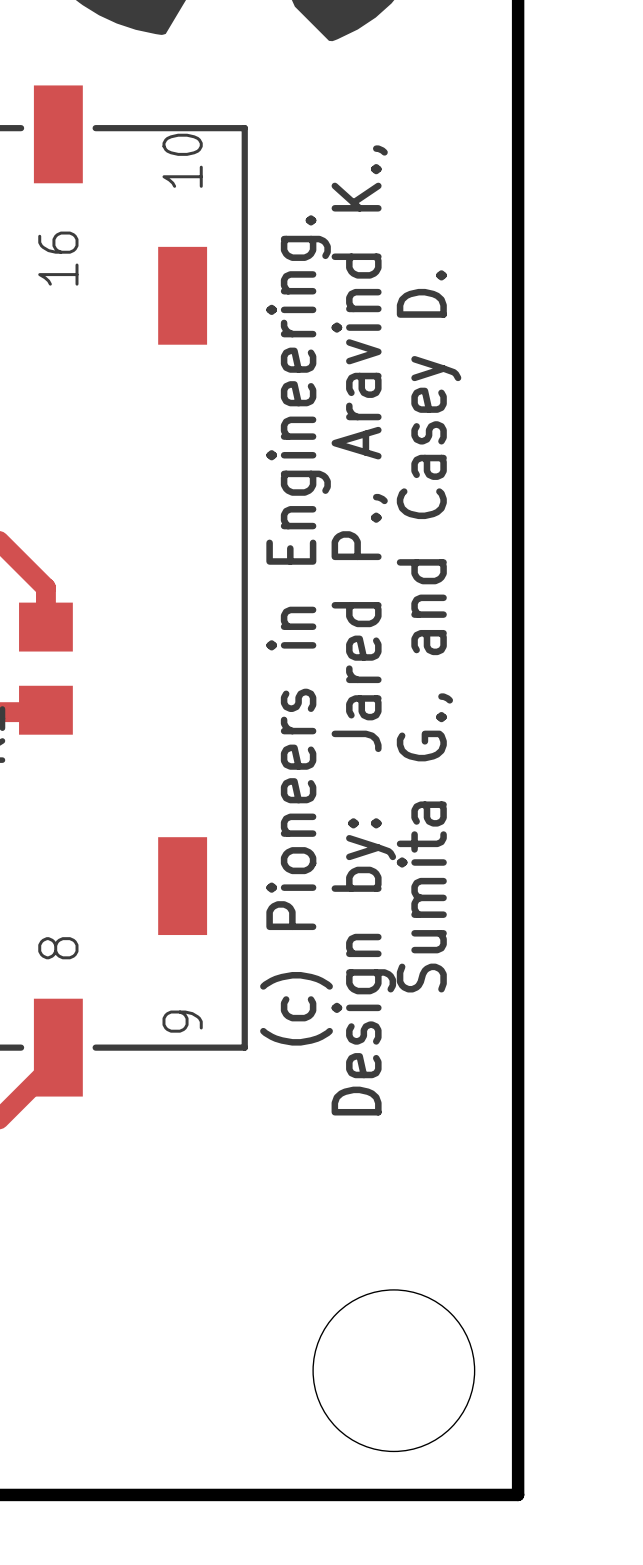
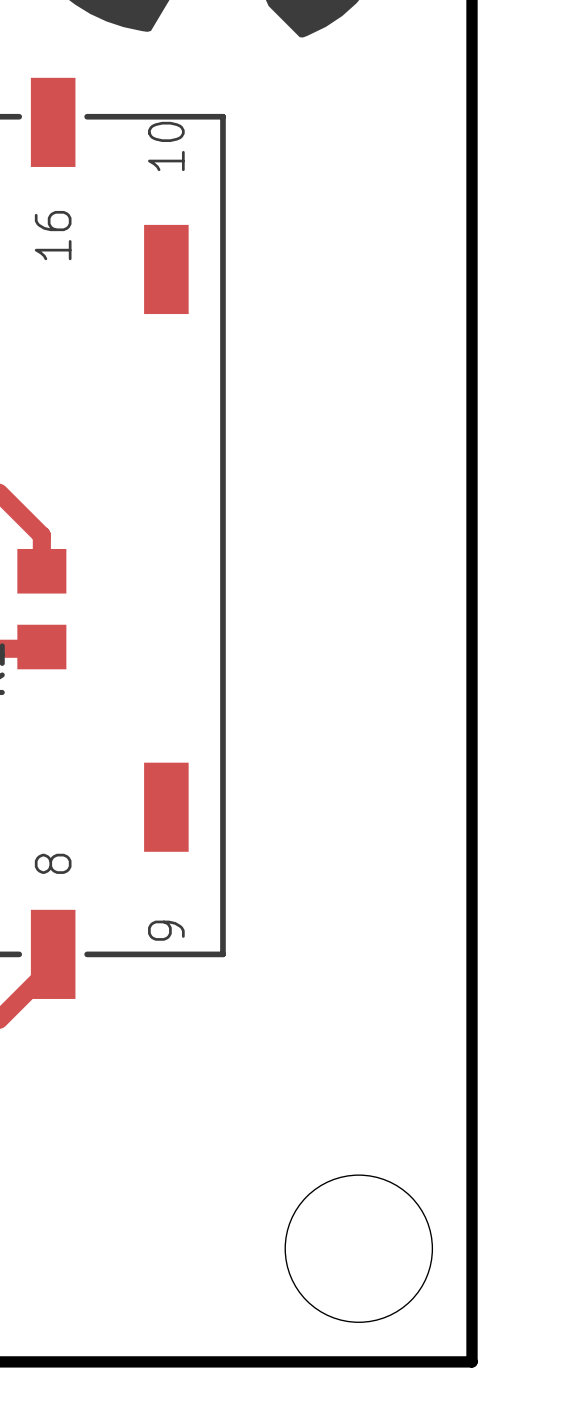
text: (c) Pioneers in Engineering. (296, 630) -> none
text: Design by: Jared P., Aravind K., (363, 630) -> none
text: Sumita G., and Casey D. (429, 631) -> none

